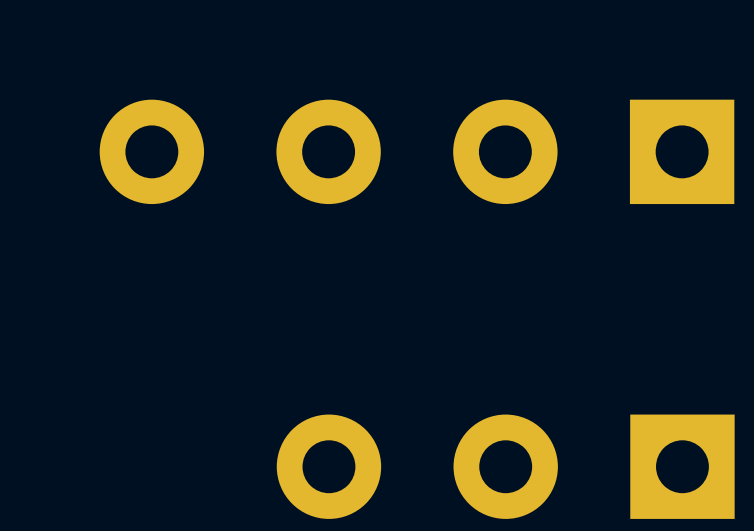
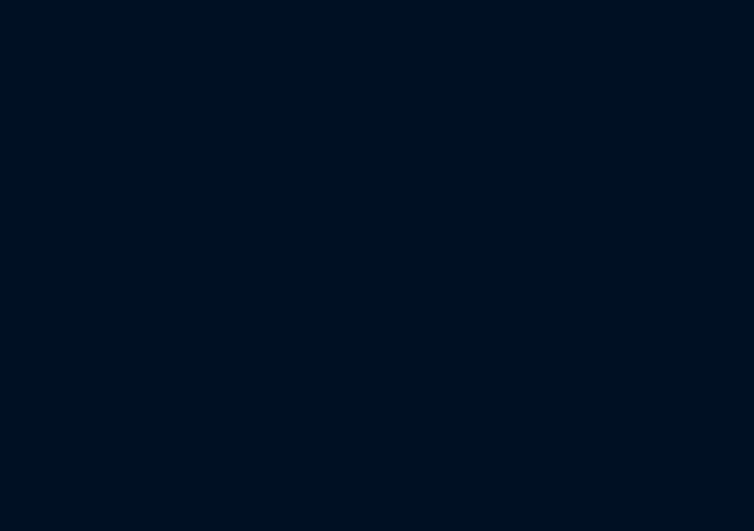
part: (416, 151) -> none
part: (505, 466) -> none

